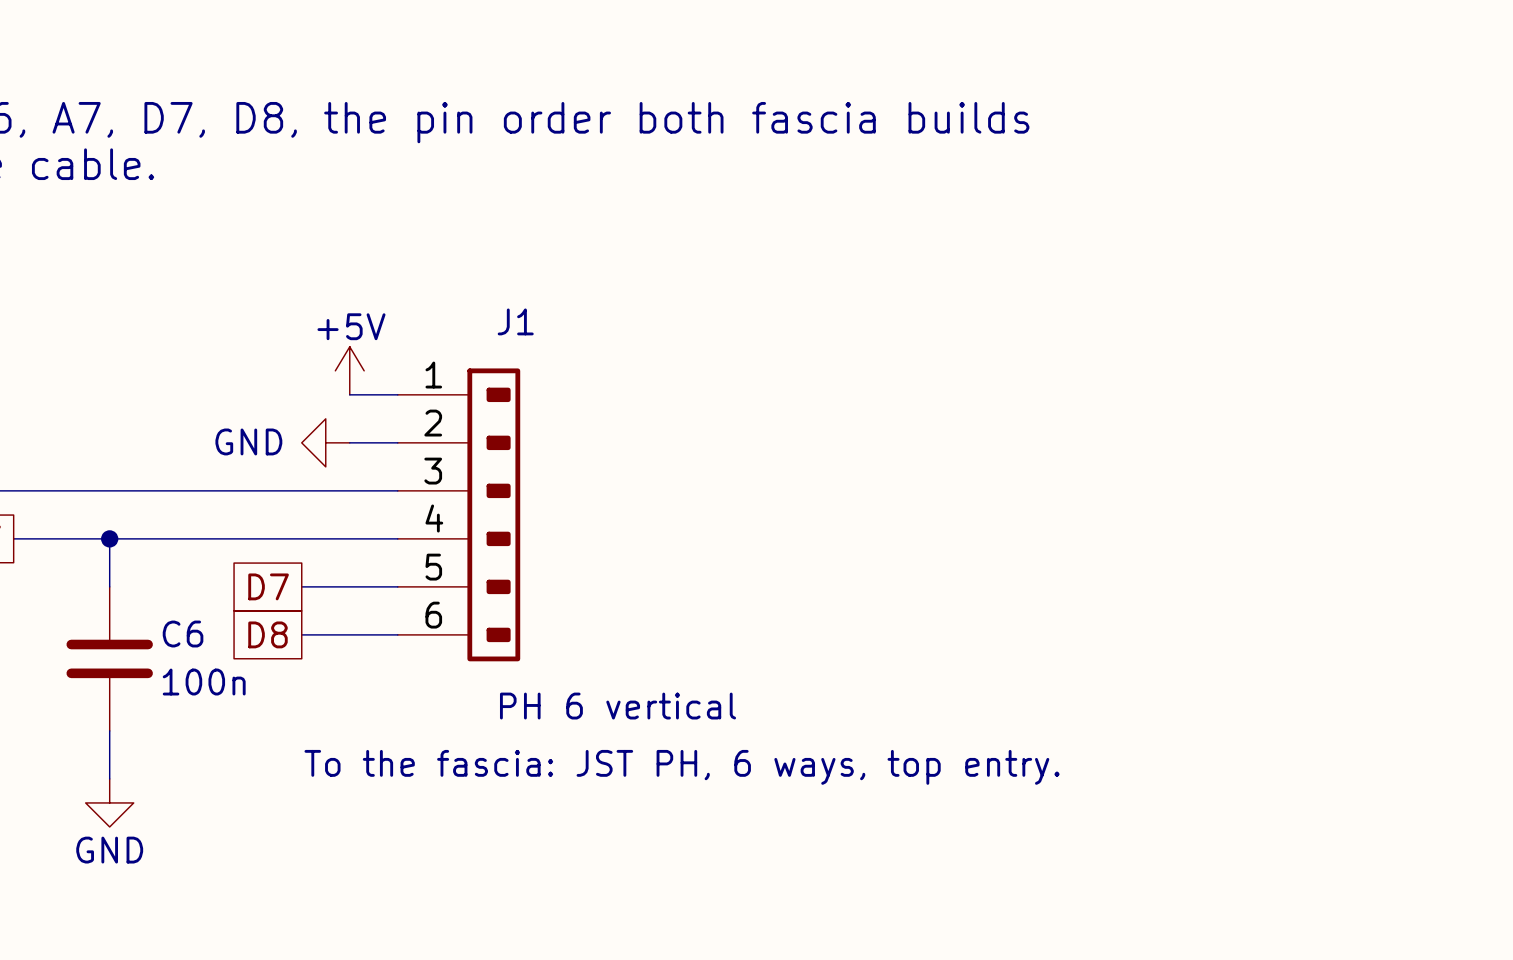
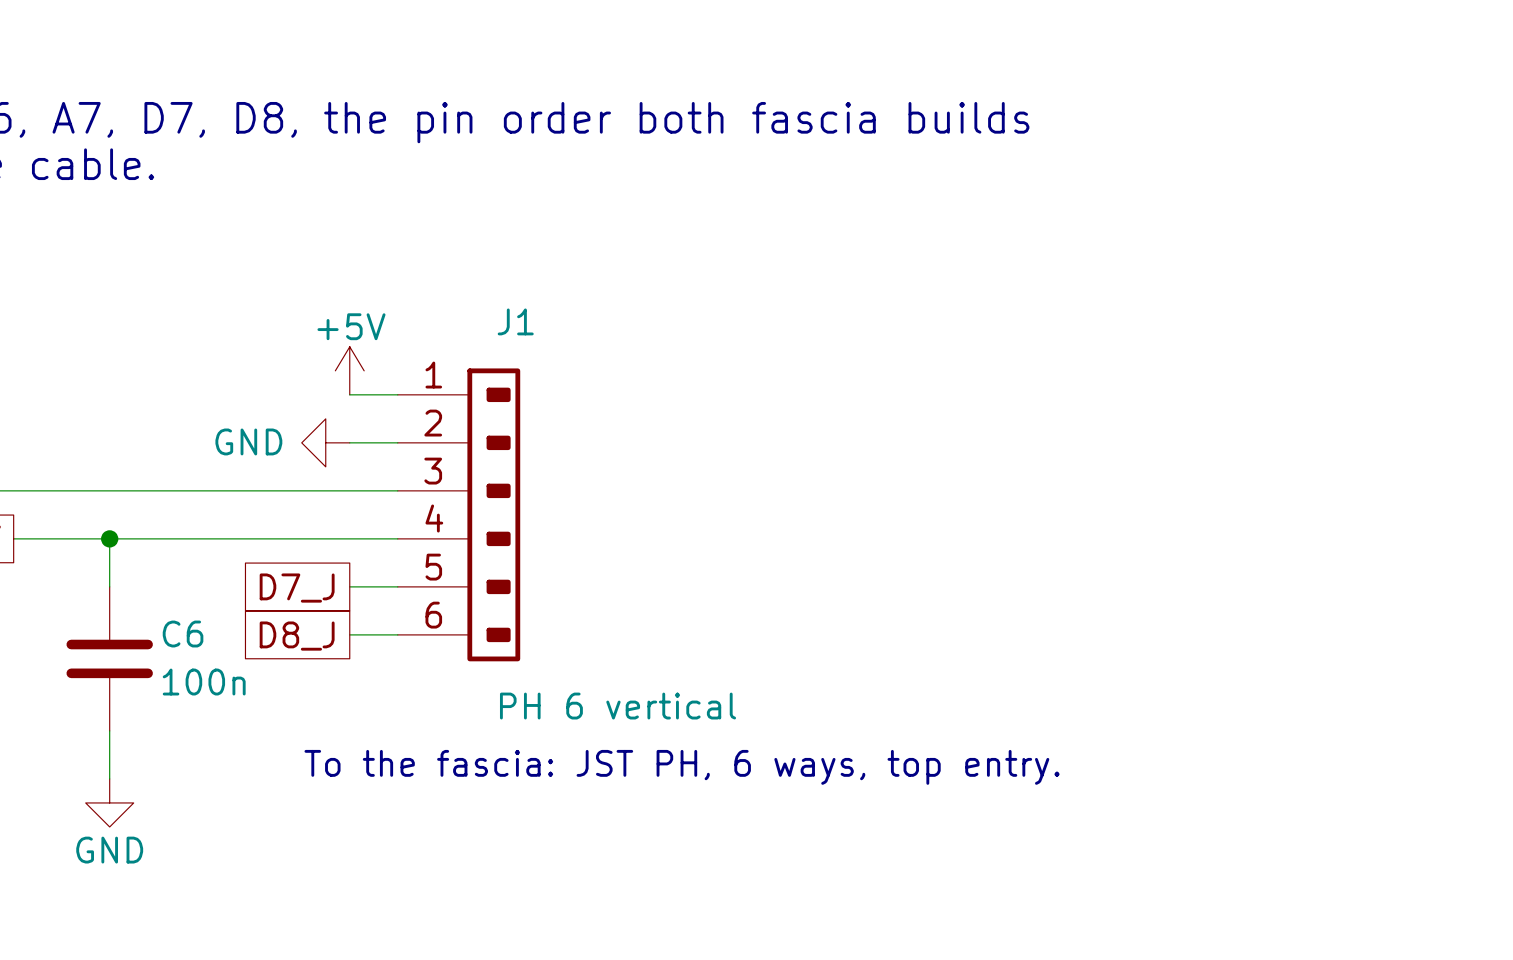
global label: D7 (268, 586) -> D7_J (297, 588)
wire: (301, 586) (349, 586) -> none
global label: D8 (267, 634) -> D8_J (297, 636)
wire: (301, 634) (349, 634) -> none

